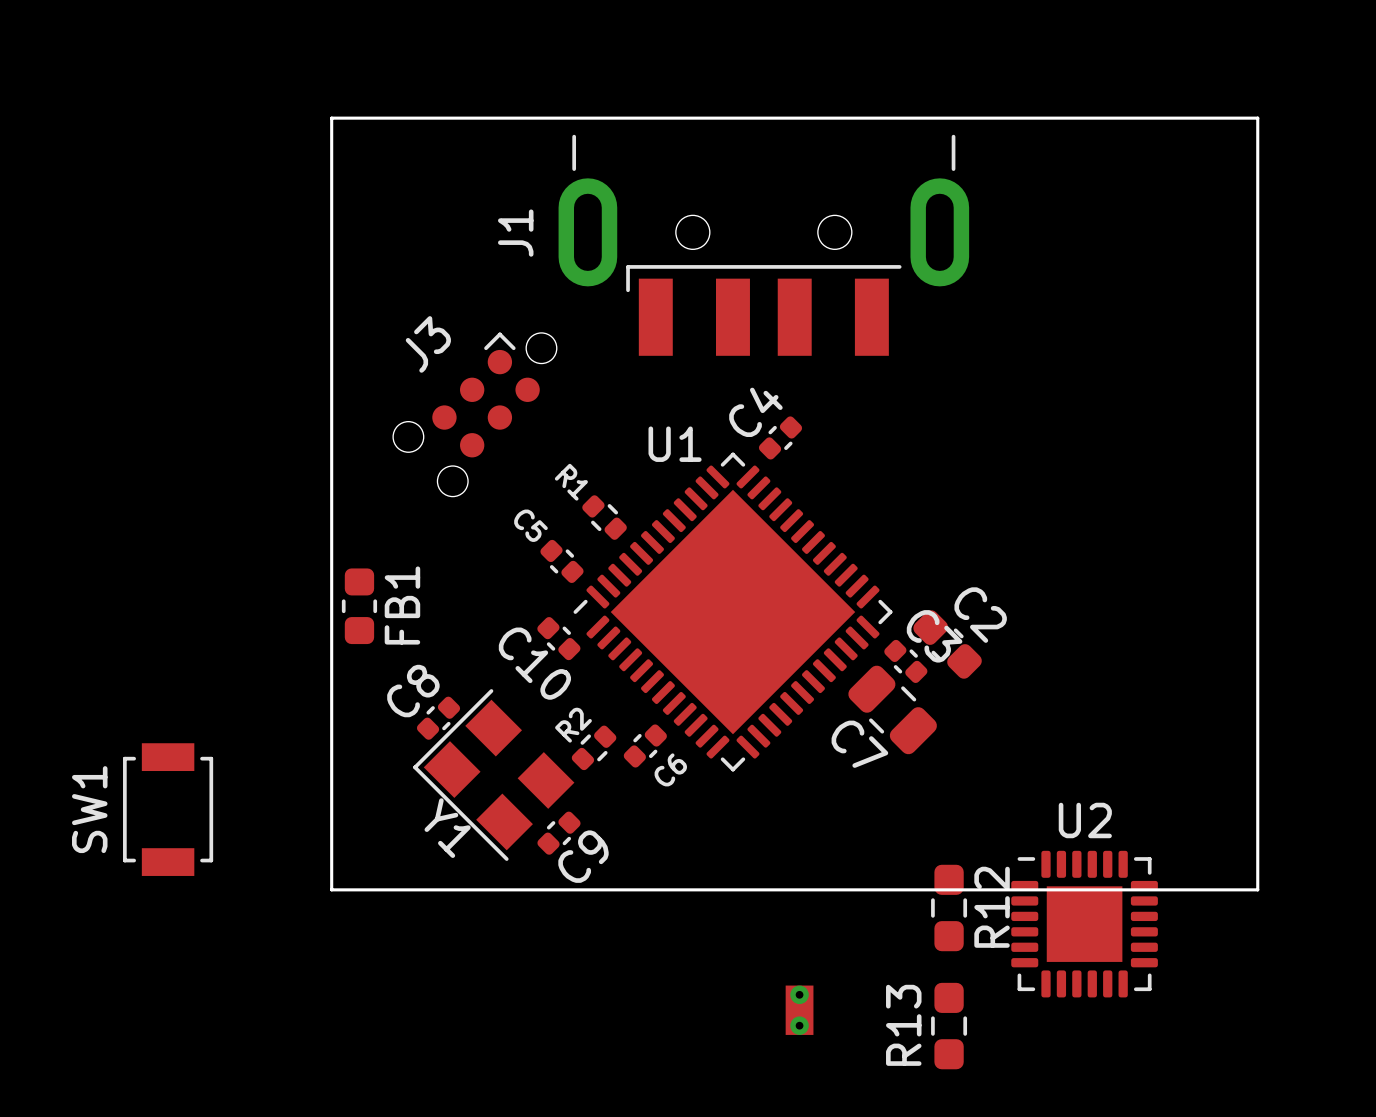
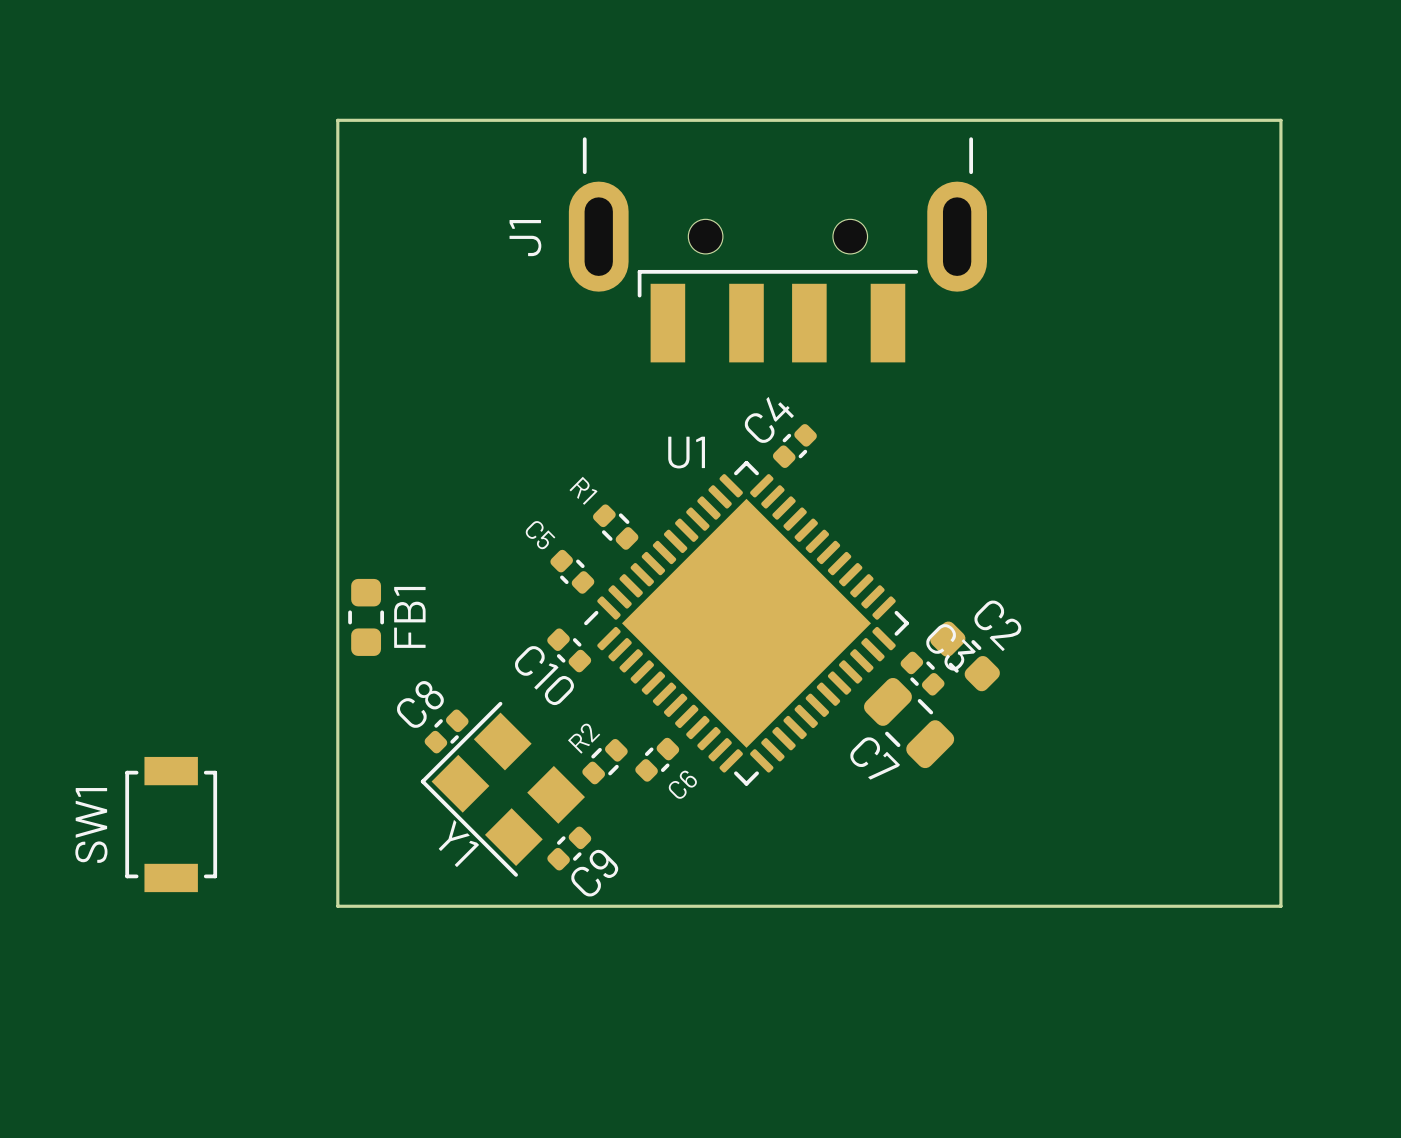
J3: (474, 414) -> none
R12: (949, 907) -> none
U2: (1084, 924) -> none
part: (799, 1010) -> none
R13: (949, 1026) -> none

